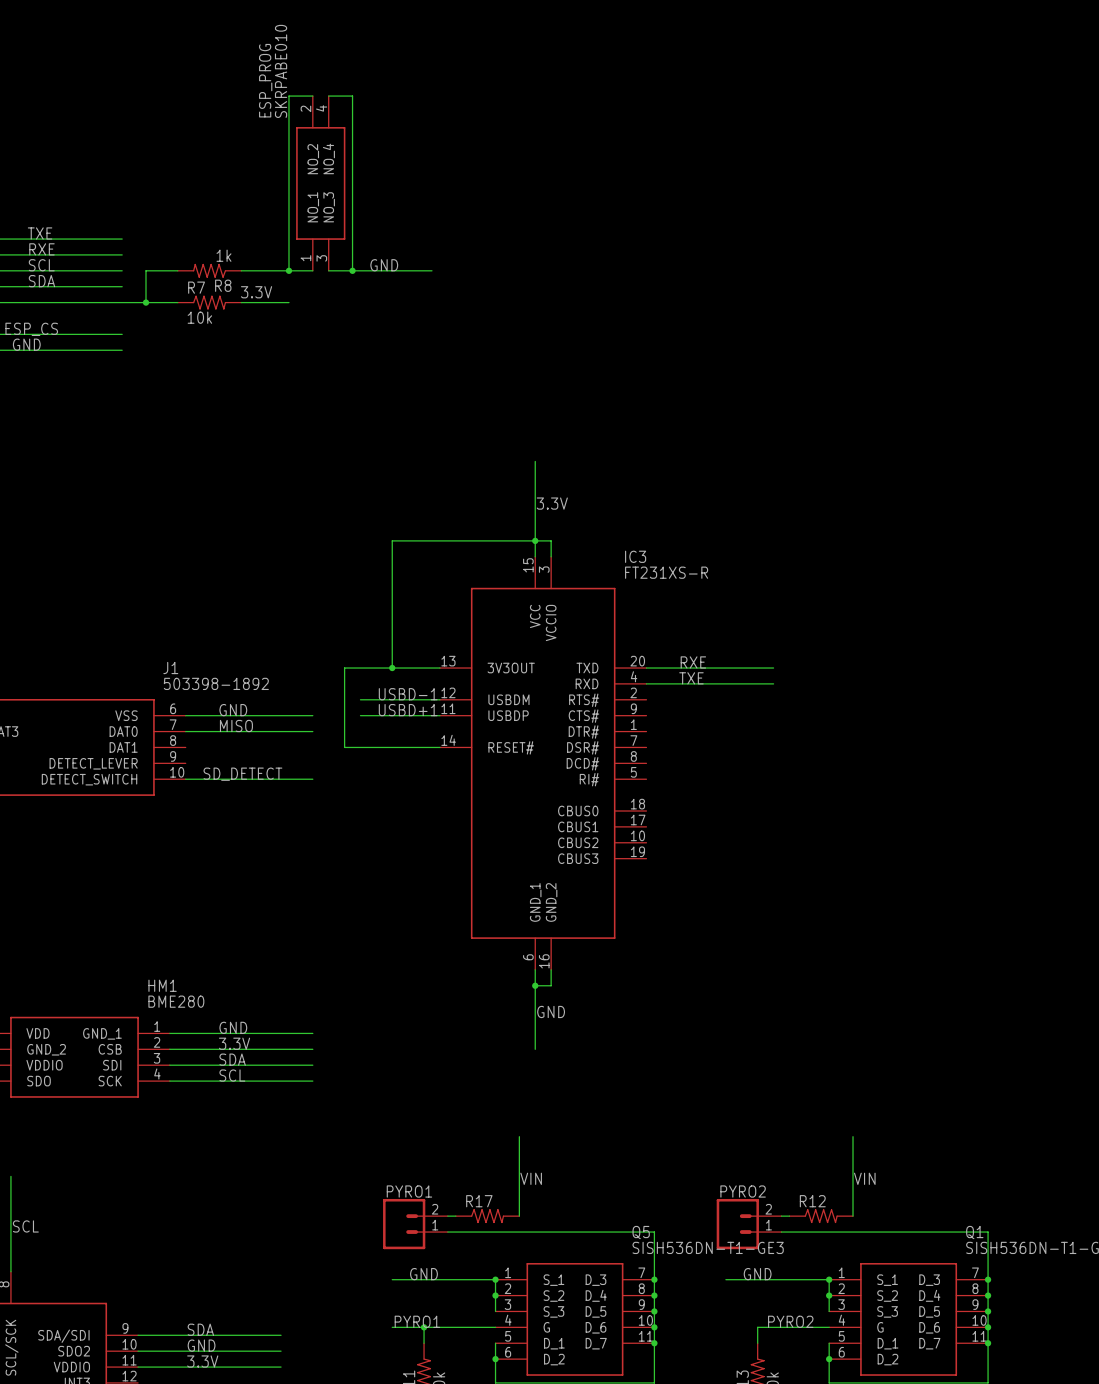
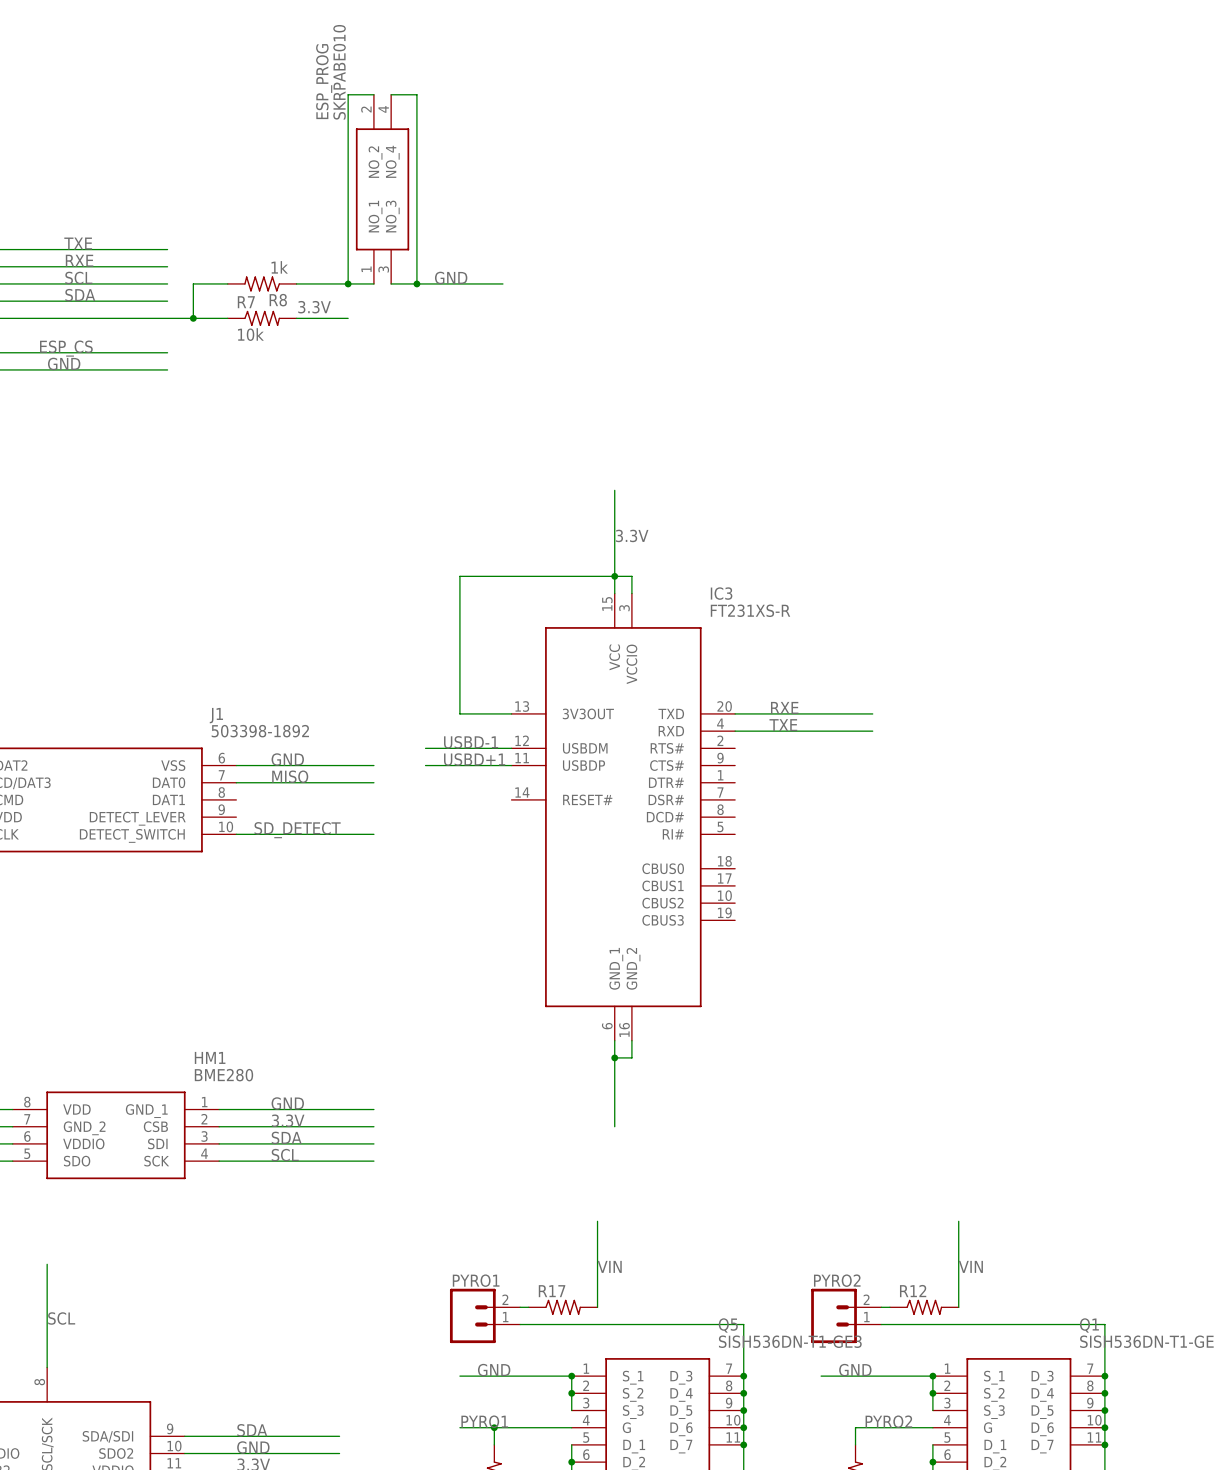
wire: (392, 668) (344, 668) (344, 747) (439, 747) -> none
junction: (392, 668) -> none
label: GND (551, 1011) -> none

